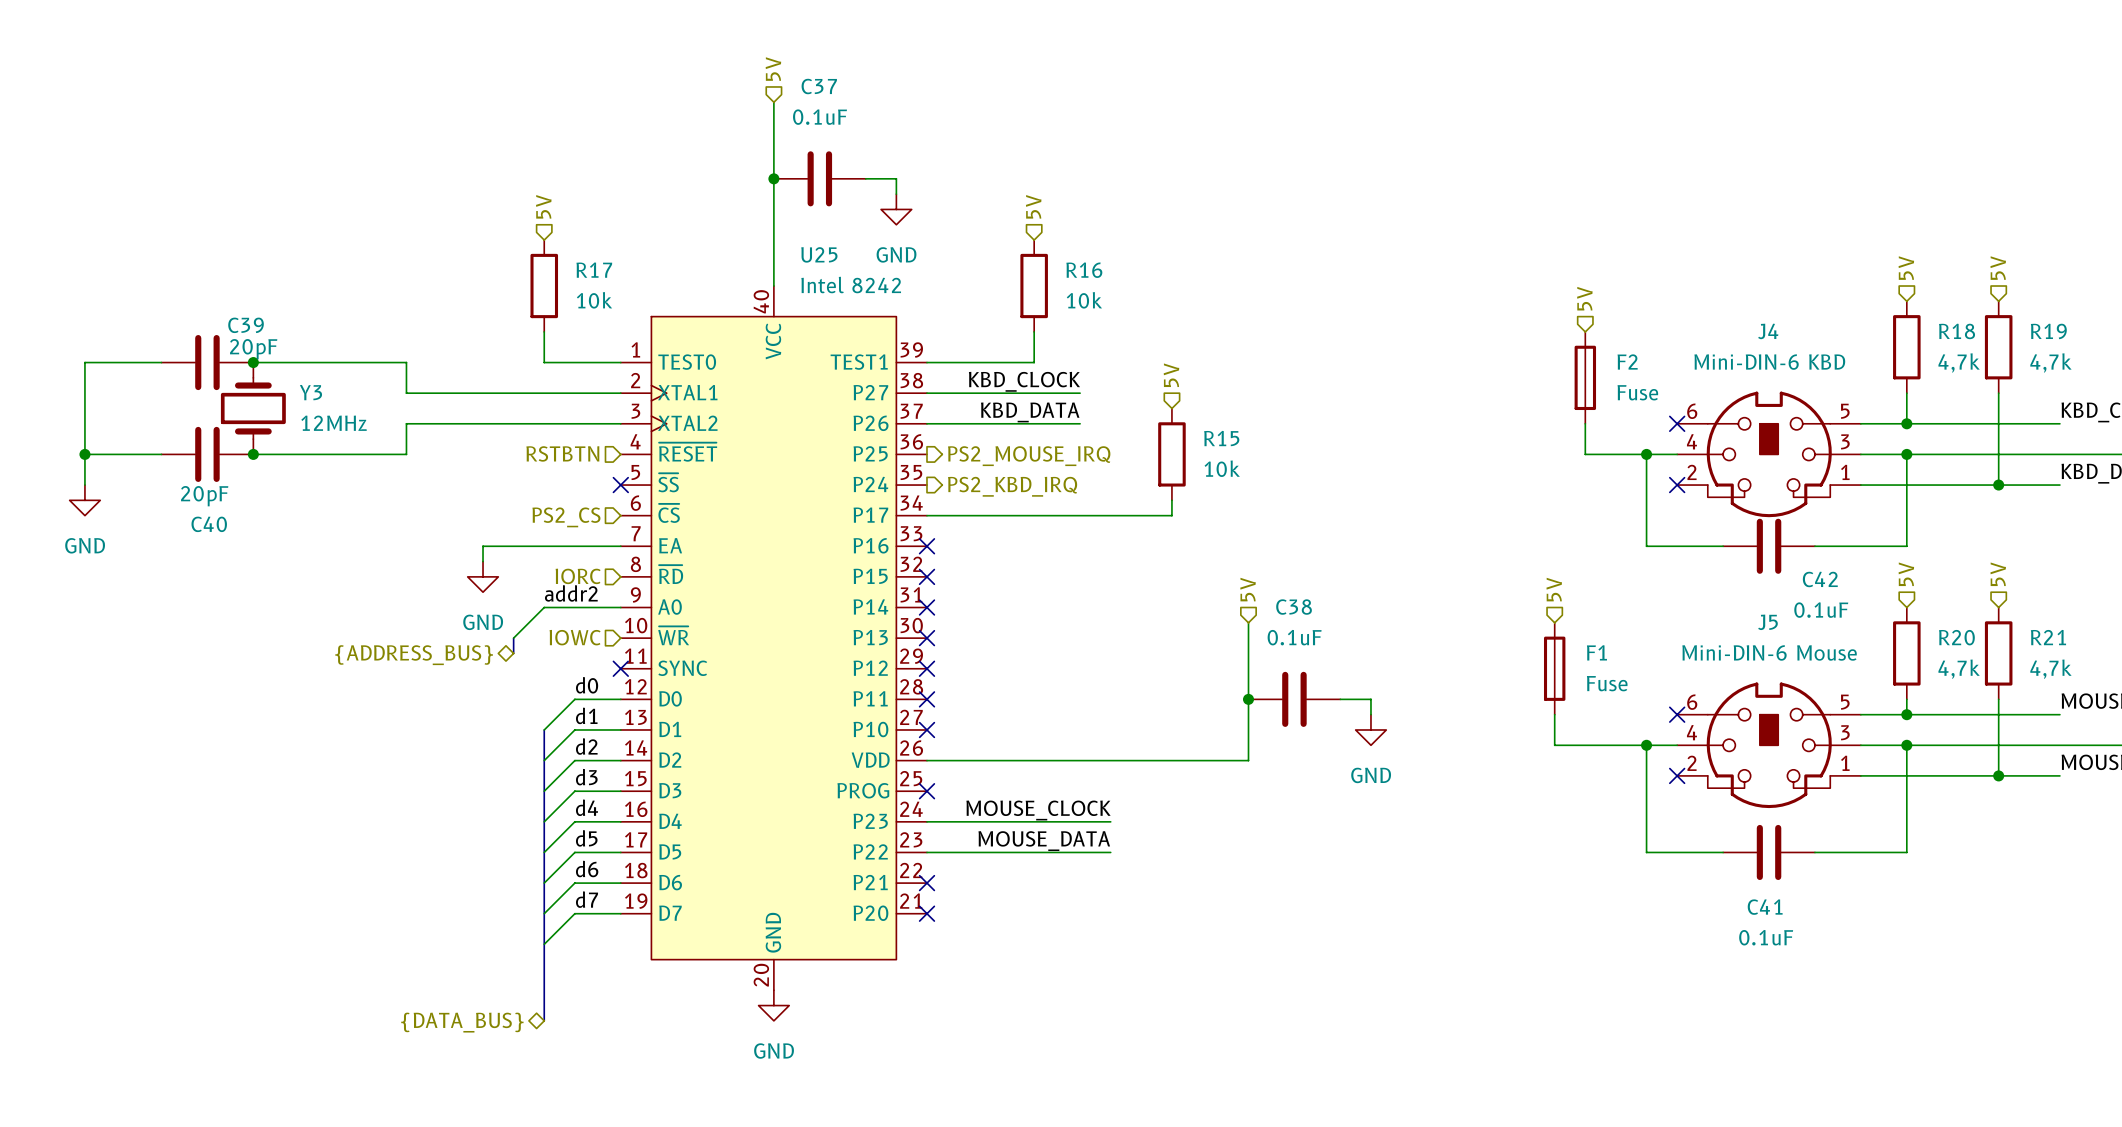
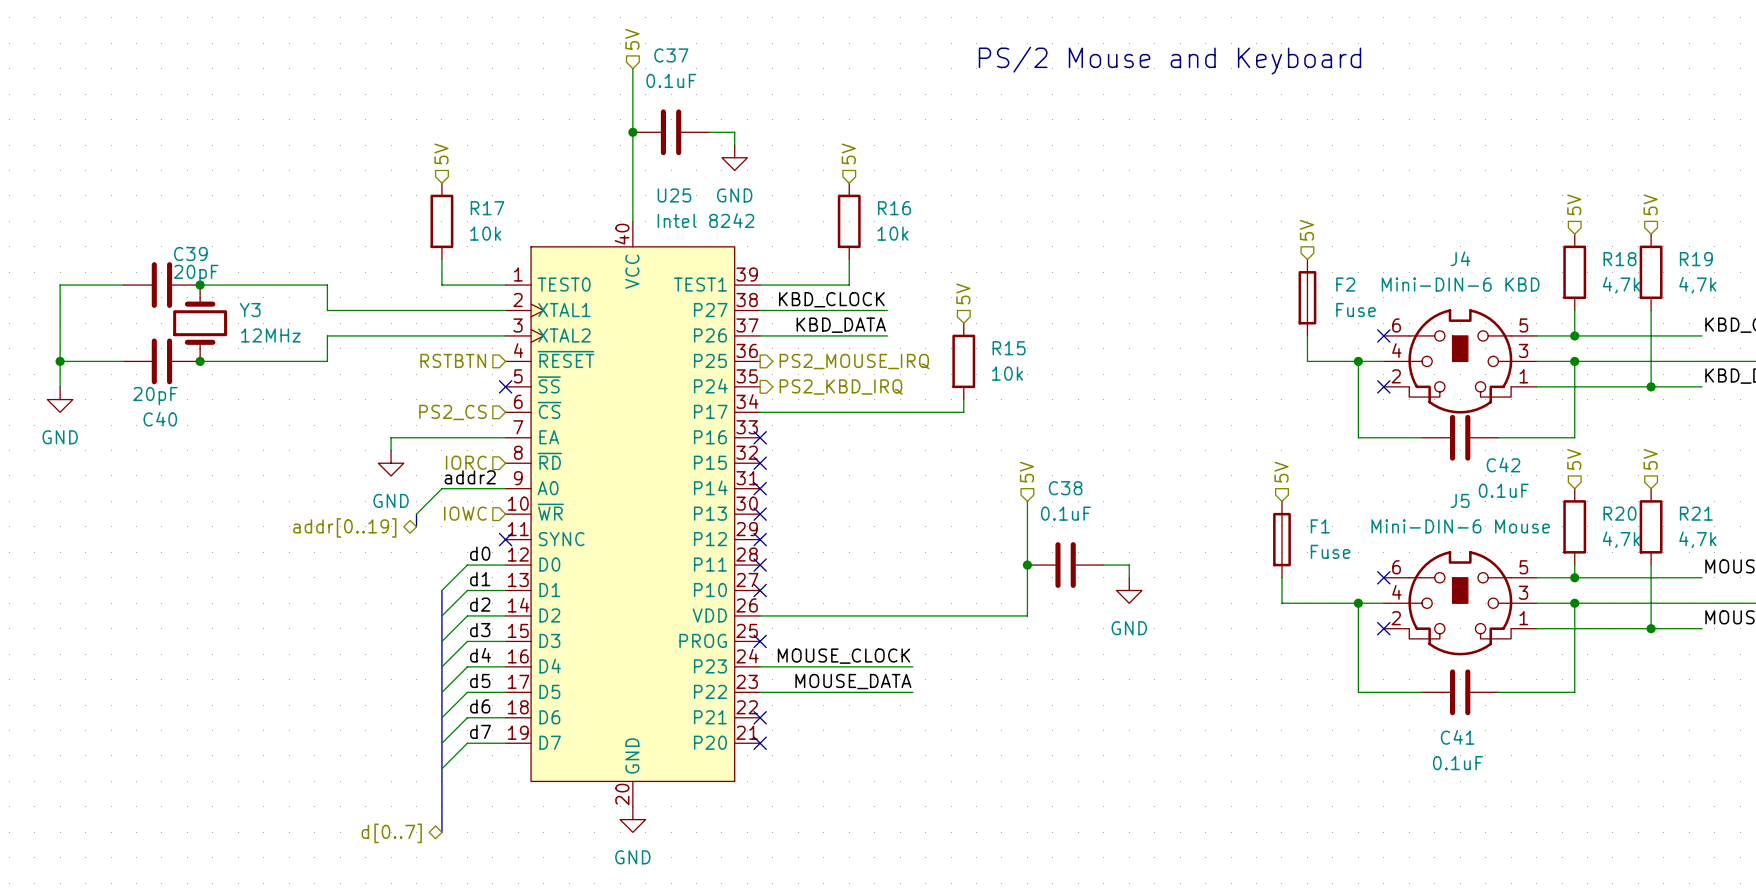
text: none -> PS/2 Mouse and Keyboard (1169, 60)
hierarchical label: {ADDRESS_BUS} (414, 655) -> addr[0..19] (344, 527)
hierarchical label: {DATA_BUS} (462, 1022) -> d[0..7] (391, 833)

